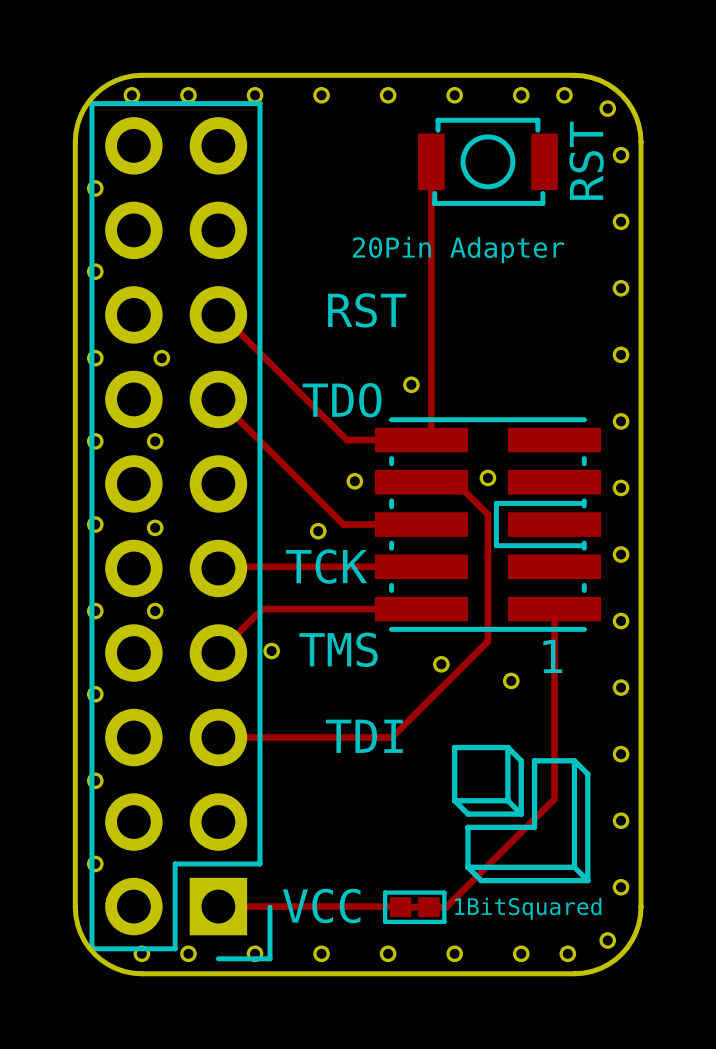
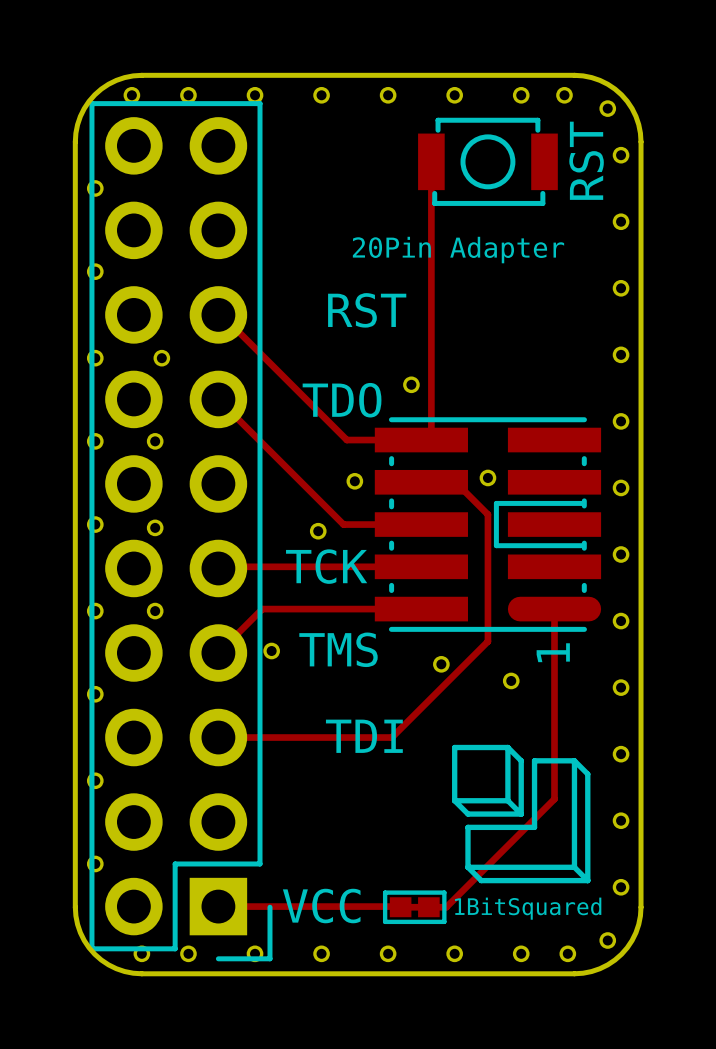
part footprint: [374, 417, 602, 632] -> [374, 417, 602, 632]
text rotation: 0° (552, 656) -> 90° counterclockwise (553, 652)

